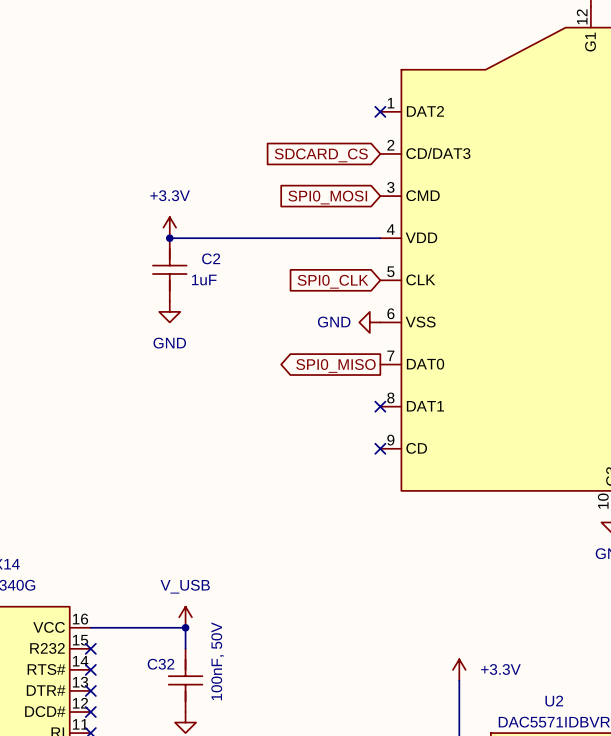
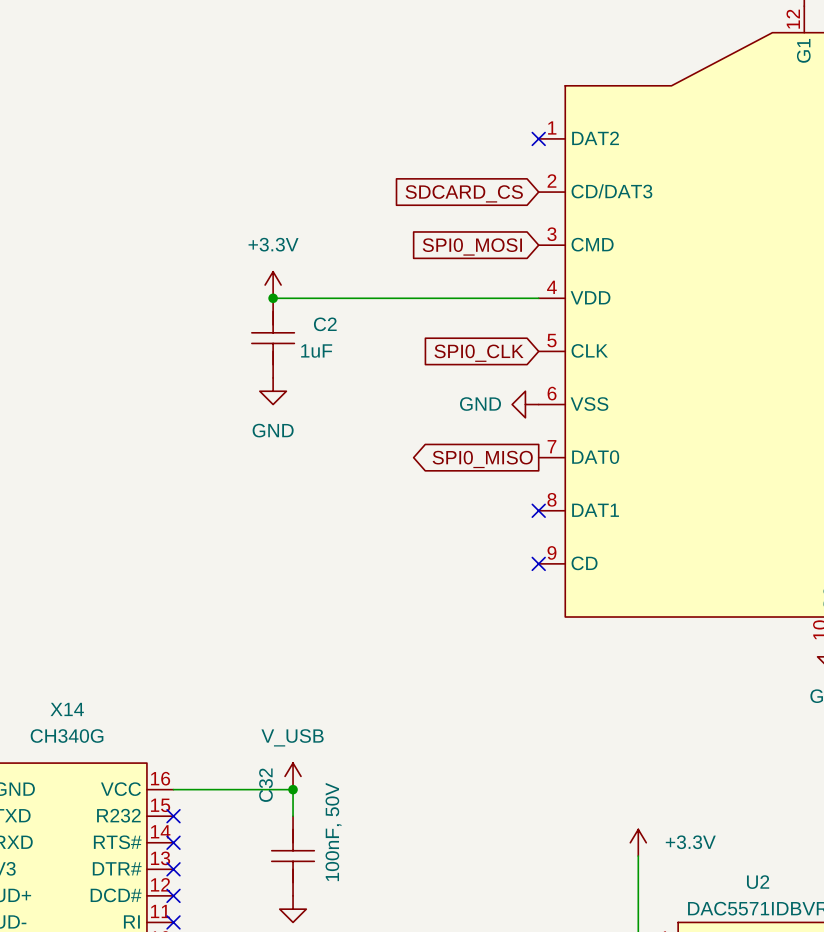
C32 name rotation: 0° (160, 664) -> 90° counterclockwise (265, 785)
C32 name position: C32 (160, 664) -> C32 (265, 785)

